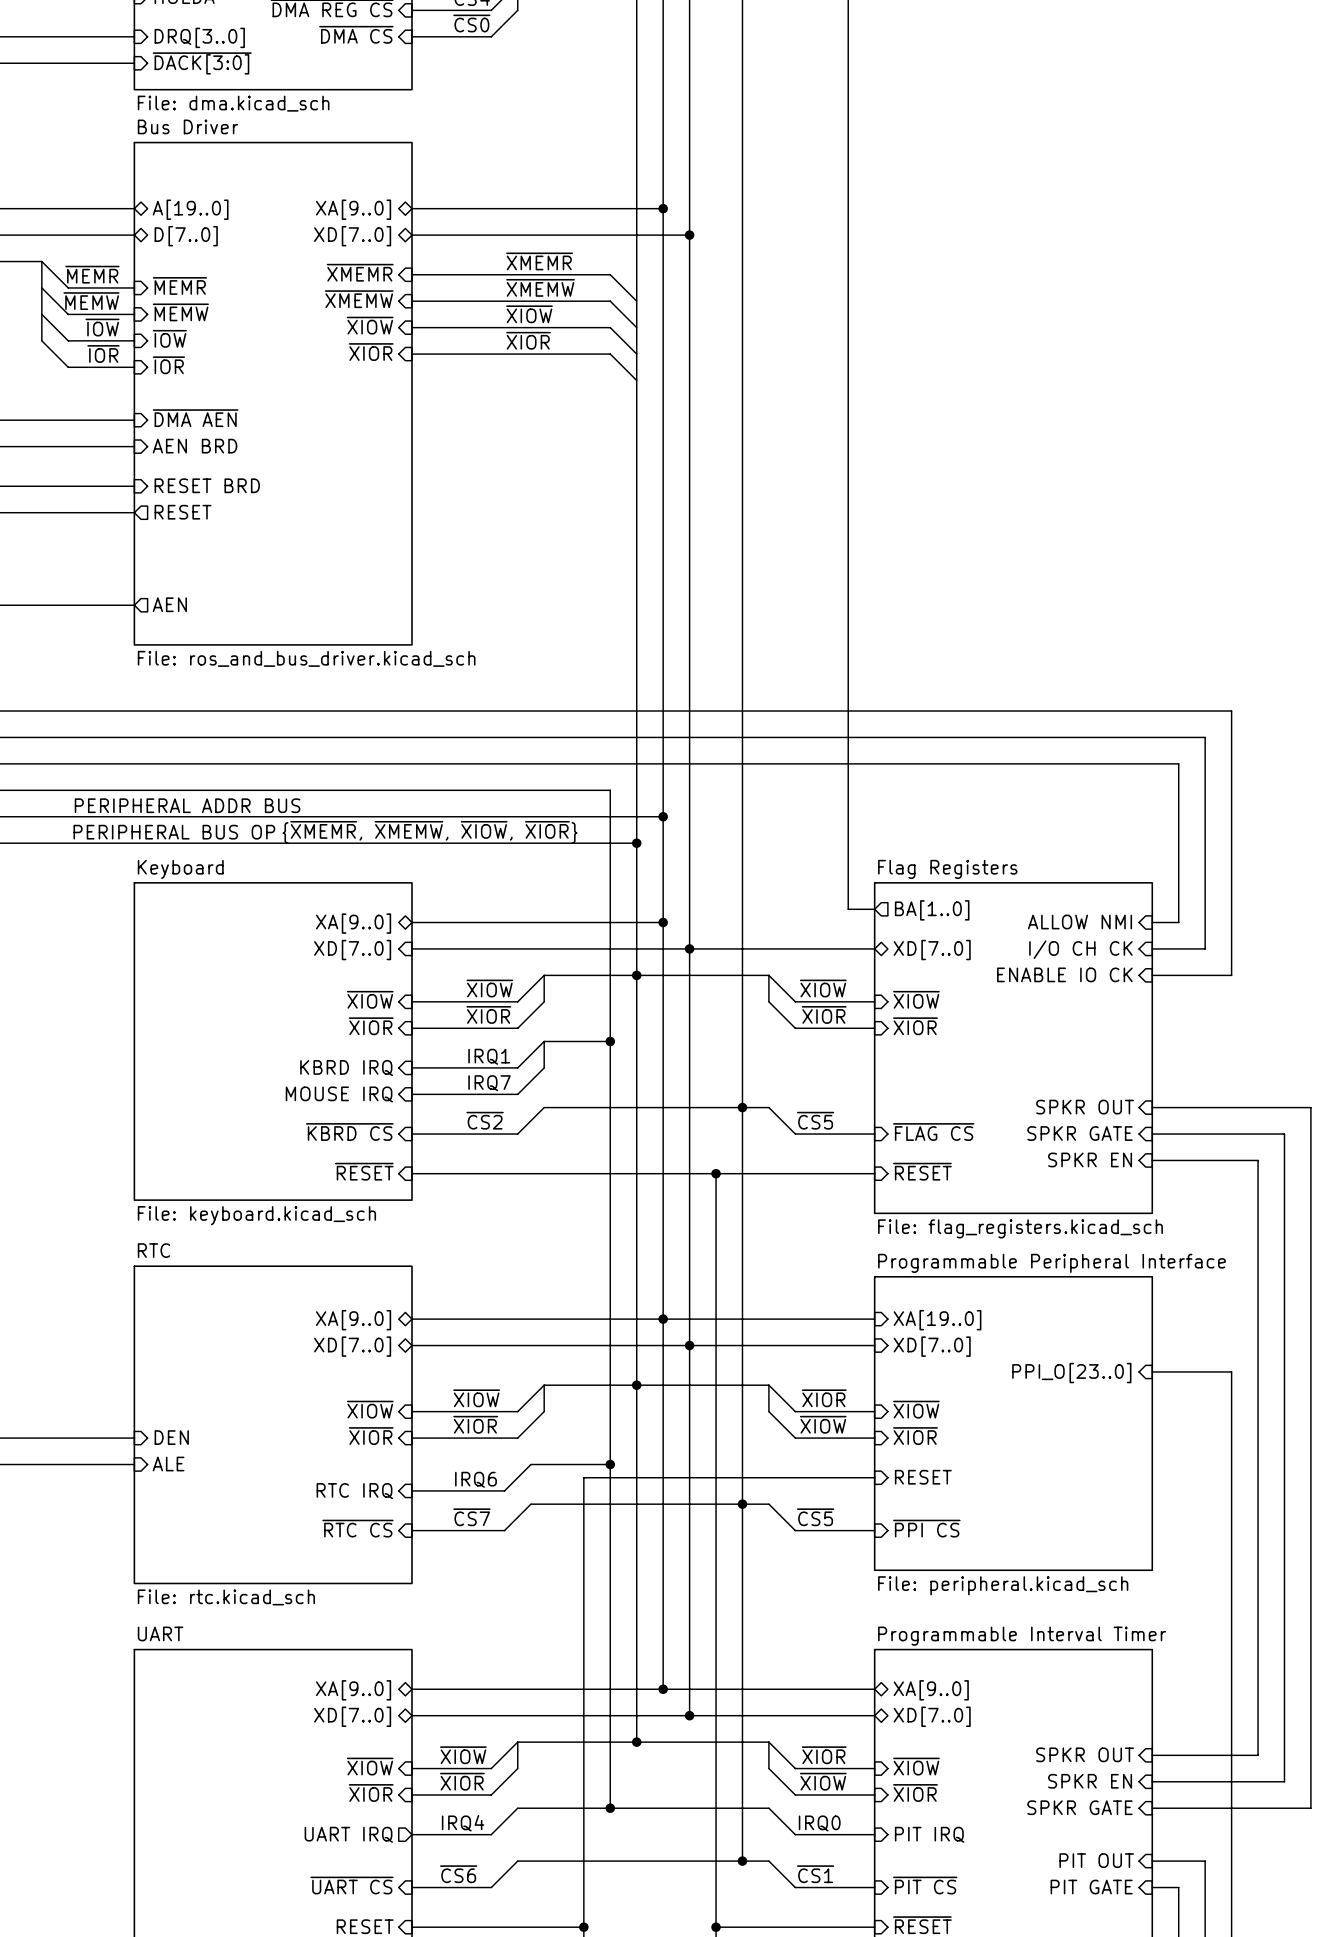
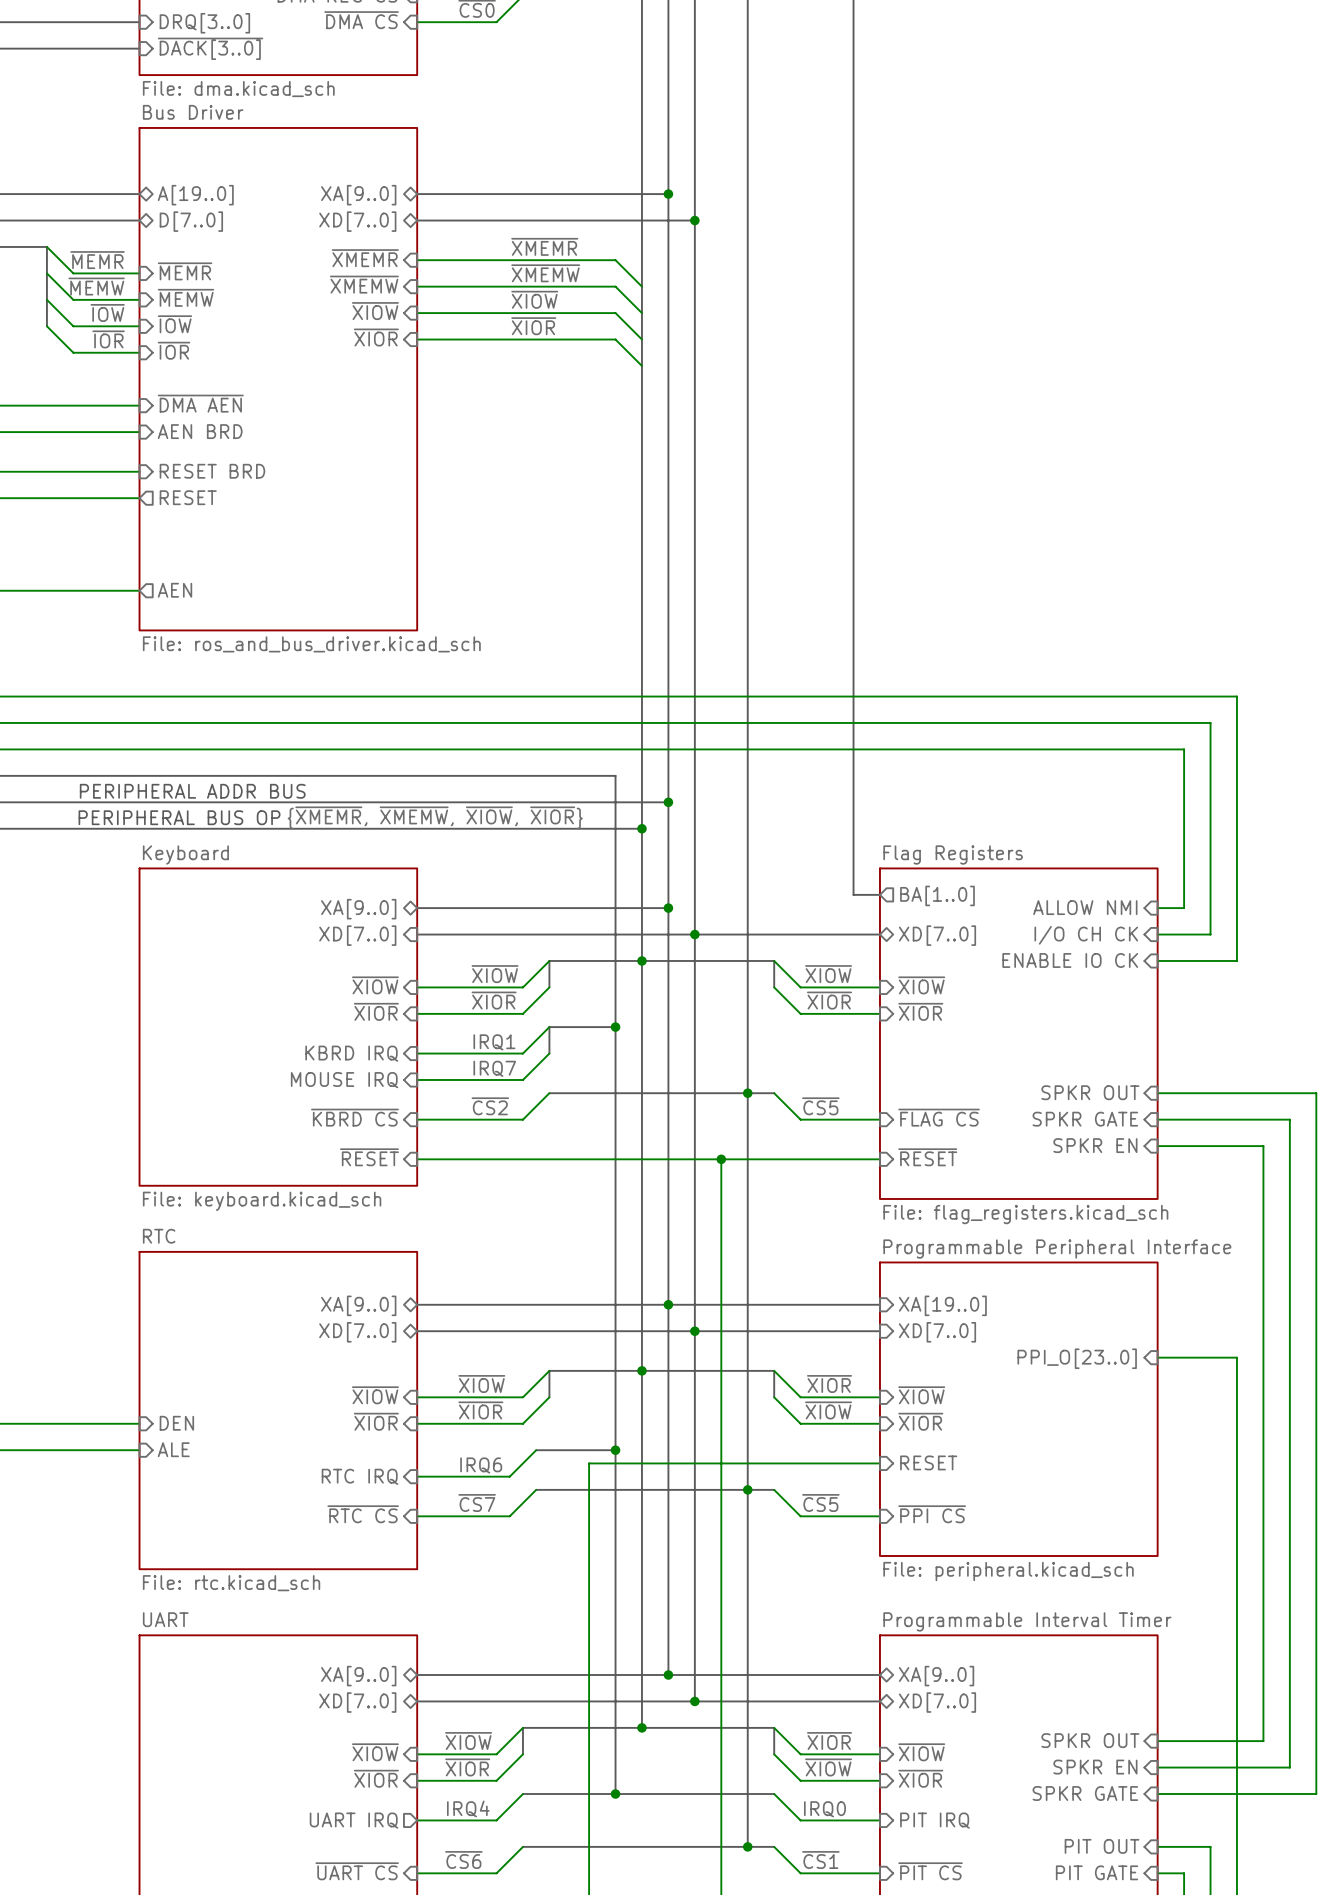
sheet pin: ~{DACK[3:0]} (202, 63) -> ~{DACK[3..0]} (210, 48)

